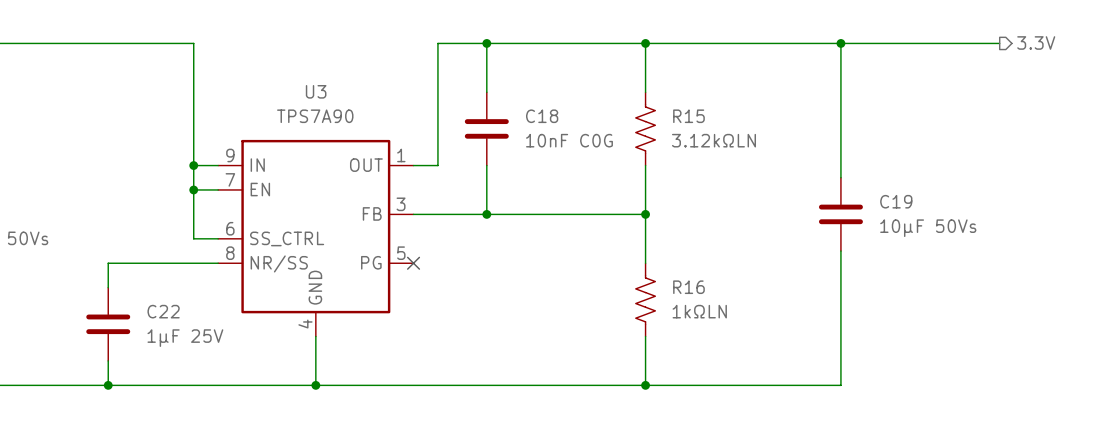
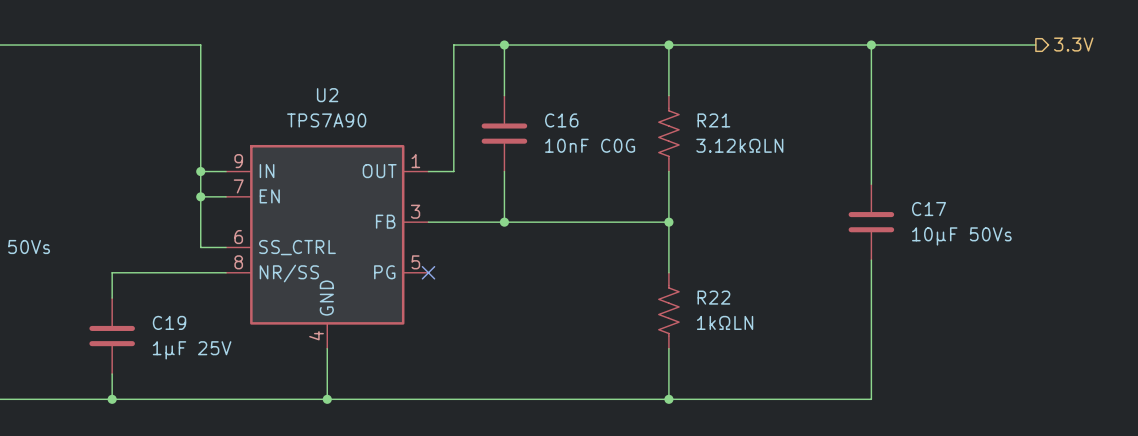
U3 name: U3 (316, 91) -> U2 (327, 95)
C18 name: C18 (542, 116) -> C16 (561, 120)
R15 name: R15 (688, 116) -> R21 (713, 120)
C19 name: C19 (896, 201) -> C17 (929, 209)
R16 name: R16 (688, 287) -> R22 (713, 297)
C22 name: C22 (163, 311) -> C19 (169, 322)

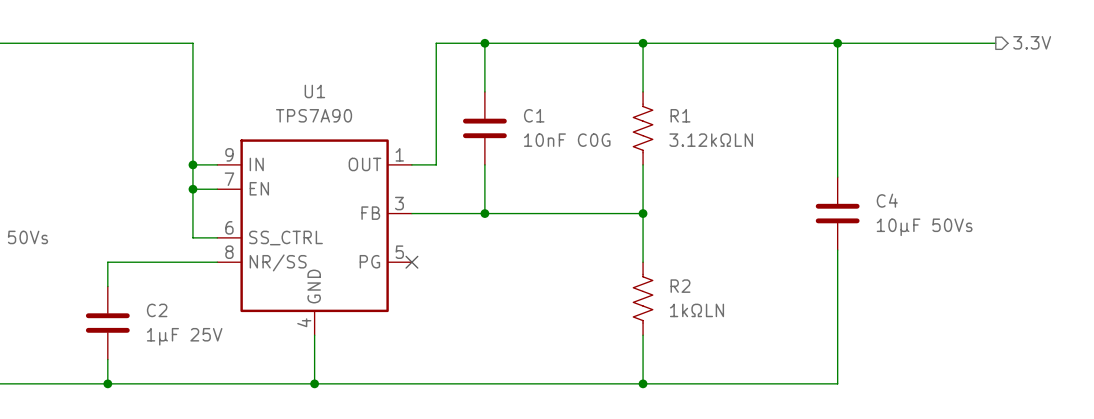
U2 name: U2 (327, 95) -> U1 (314, 91)
C16 name: C16 (561, 120) -> C1 (534, 115)
R21 name: R21 (713, 120) -> R1 (680, 115)
C17 name: C17 (929, 209) -> C4 (887, 200)
R22 name: R22 (713, 297) -> R2 (680, 286)
C19 name: C19 (169, 322) -> C2 (157, 310)

